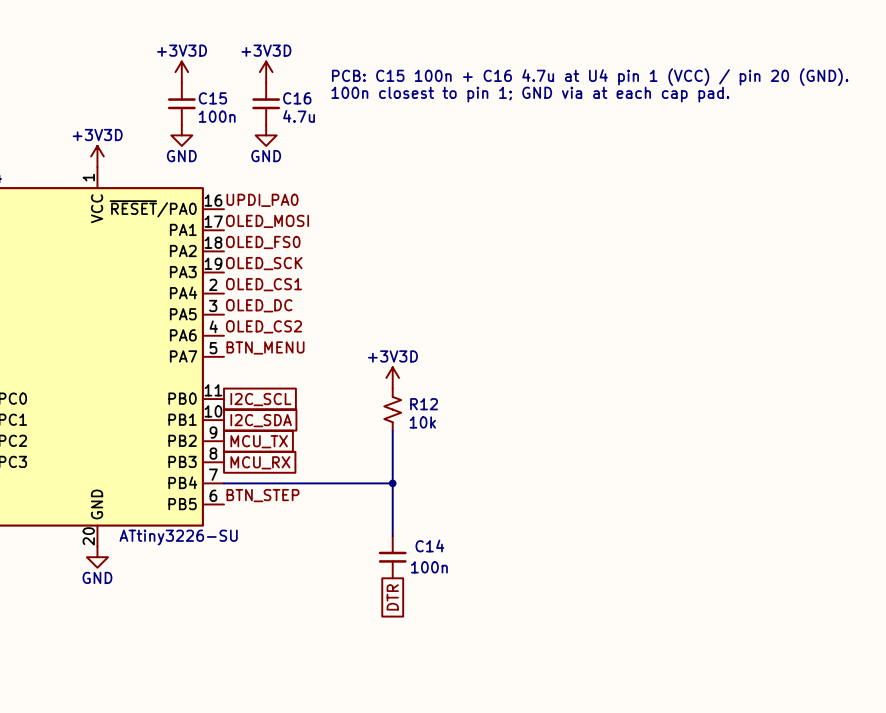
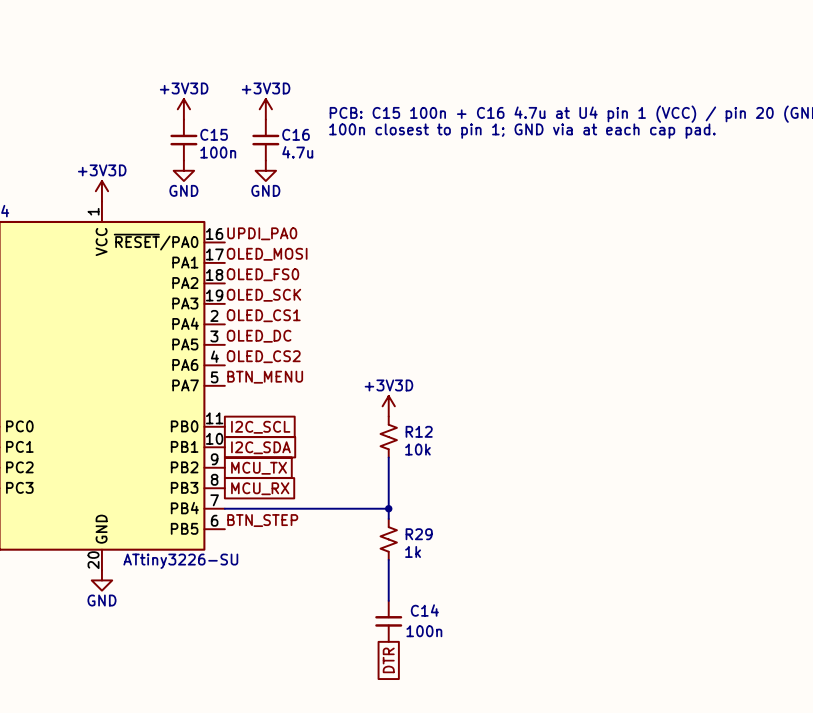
R29: none -> 1k (388, 539)
C14 position: (392, 557) -> (388, 621)
global label position: DTR (392, 597) -> DTR (388, 660)

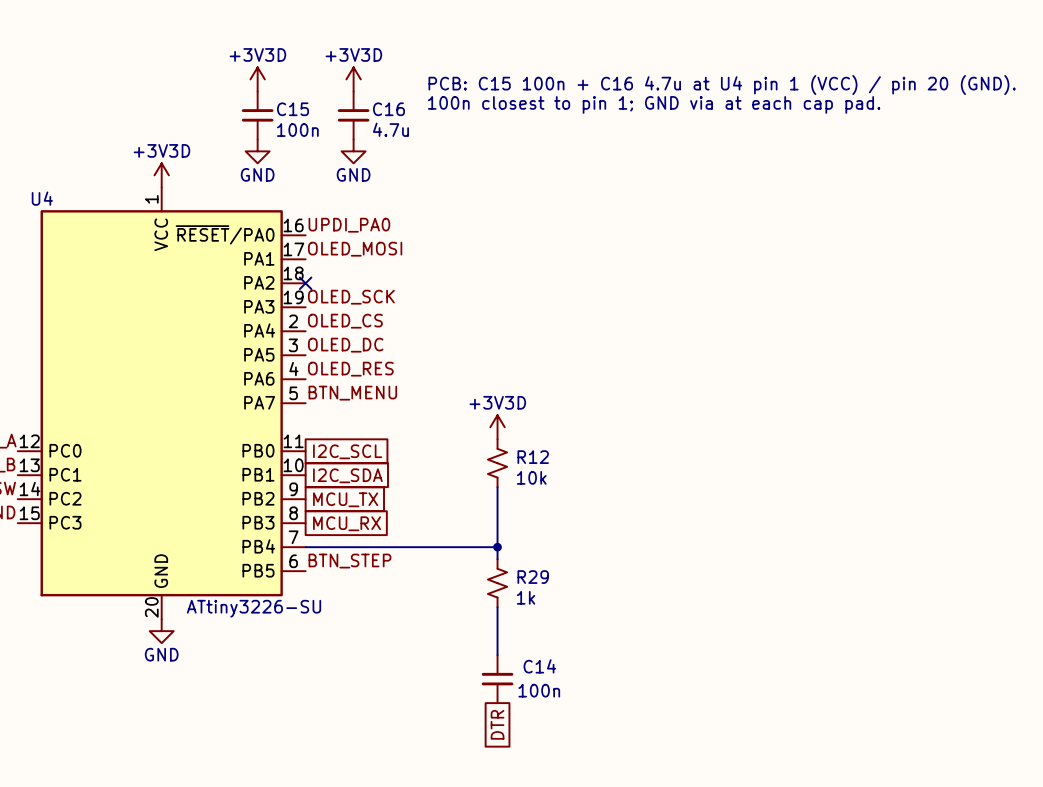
label: OLED_FS0 (262, 274) -> none
no-connect mark: none -> (305, 283)
label: OLED_CS1 (263, 315) -> OLED_CS (345, 321)
label: OLED_CS2 (263, 356) -> OLED_RES (350, 369)

